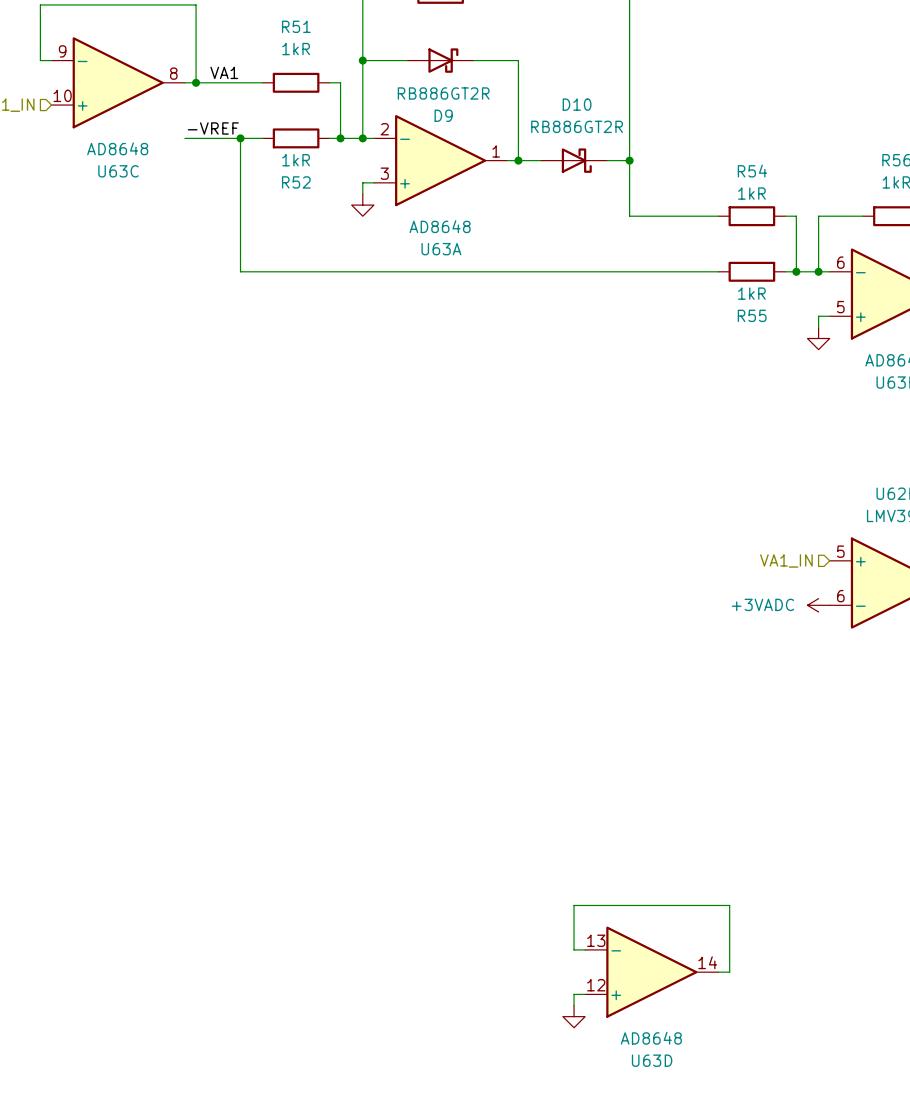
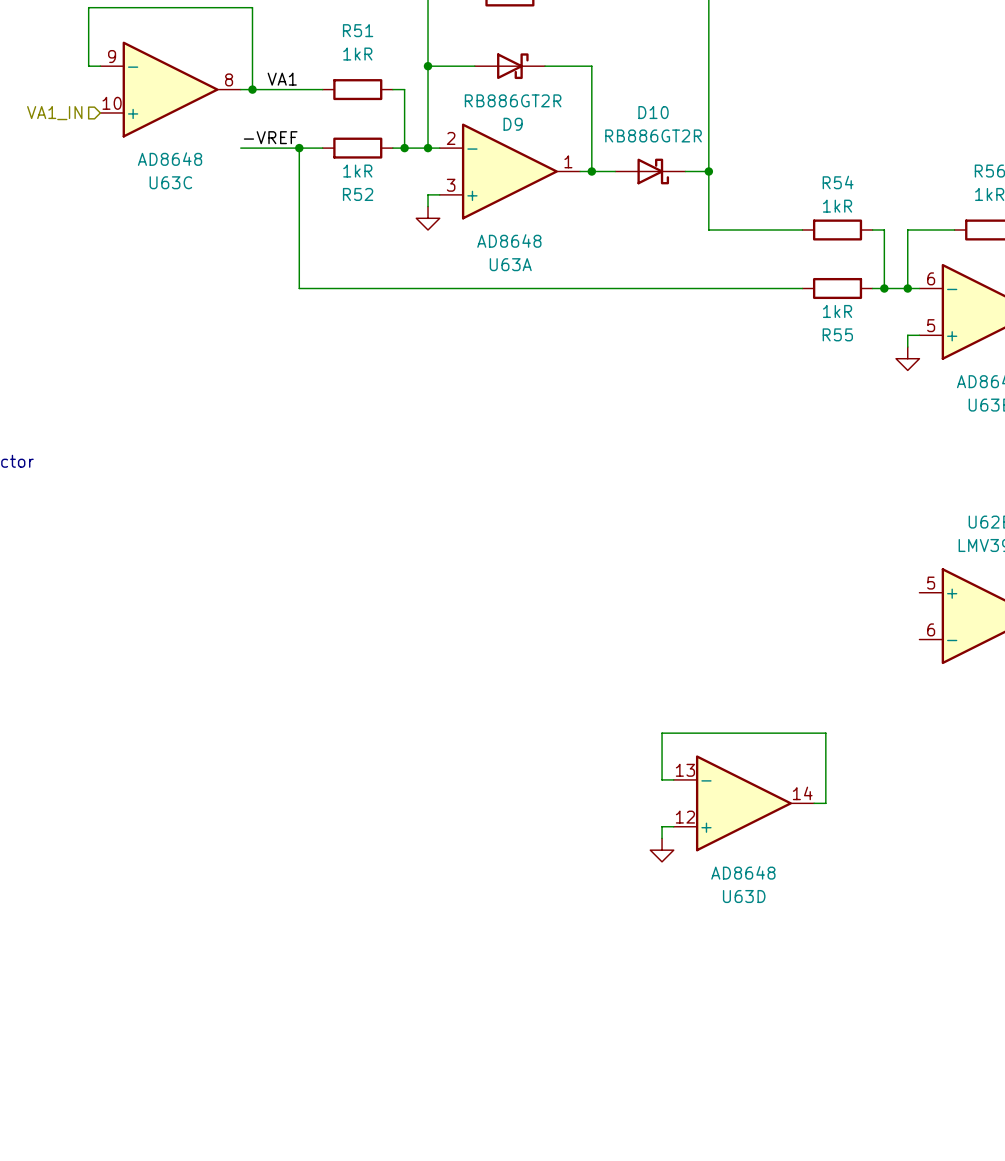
hierarchical label: VA1_IN (786, 560) -> none
power symbol: +3VADC (818, 605) -> none
wire: (585, 949) (574, 949) (574, 905) (729, 905) (729, 972) (718, 972) -> (673, 779) (662, 779) (662, 733) (825, 733) (825, 803) (814, 803)
U63D position: (651, 972) -> (743, 803)
wire: (585, 994) (574, 994) (574, 1005) -> (673, 826) (662, 826) (662, 838)
power symbol position: (574, 1016) -> (662, 850)

